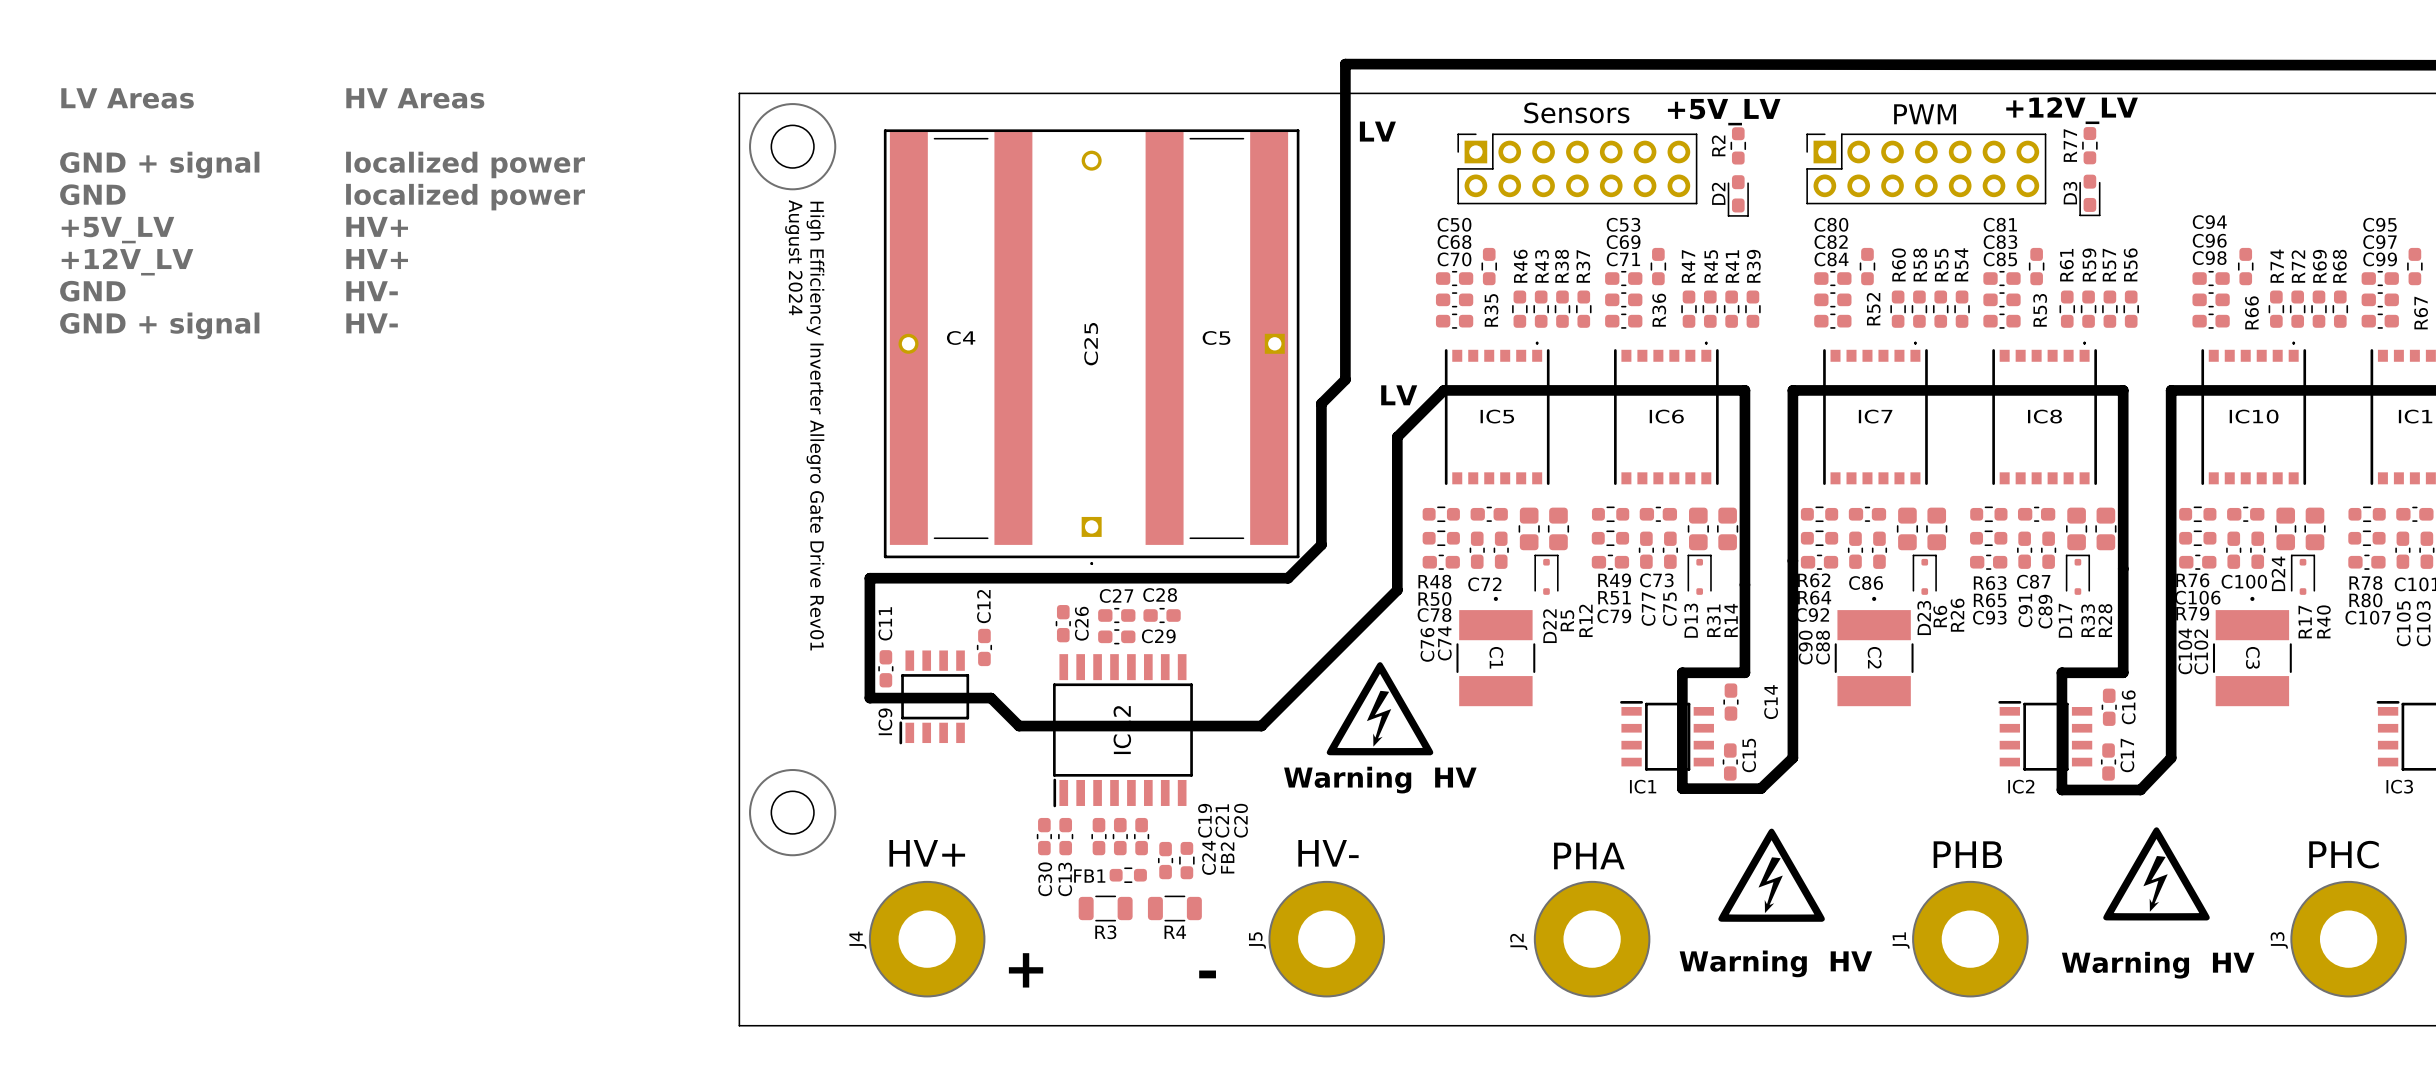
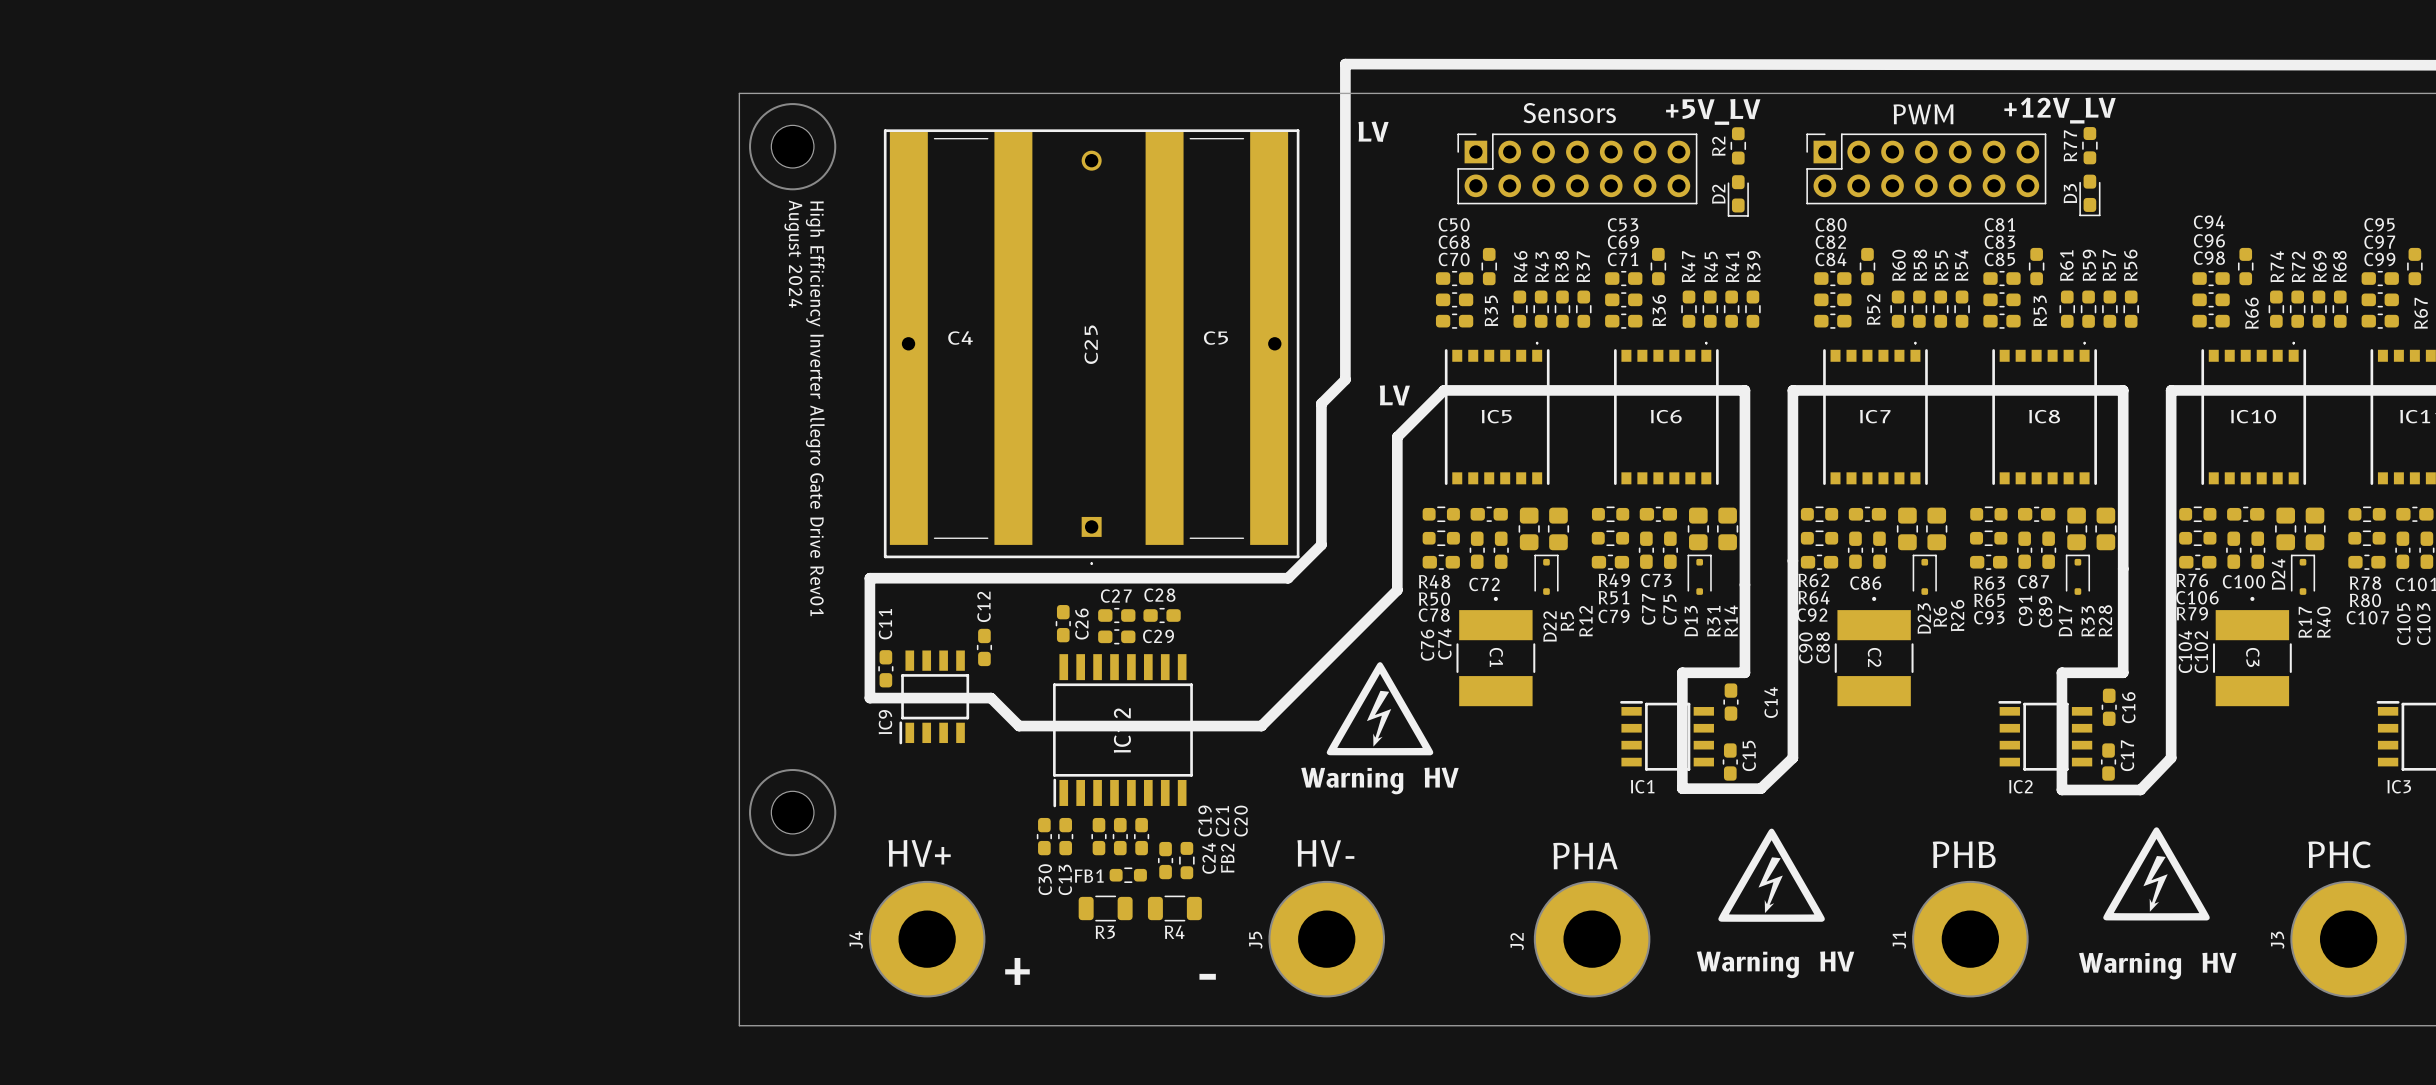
text: LV Areas (127, 98) -> none
text: HV Areas (415, 98) -> none
text: localized power (465, 164) -> none
text: GND + signal (159, 165) -> none
text: GND (92, 194) -> none
text: localized power (465, 197) -> none
text: HV+ (377, 226) -> none
text: +5V_LV (117, 230) -> none
text: HV+ (377, 259) -> none
text: +12V_LV (127, 262) -> none
text: GND (92, 291) -> none
text: HV- (372, 291) -> none
text: HV- (372, 323) -> none
text: GND + signal (159, 325) -> none

